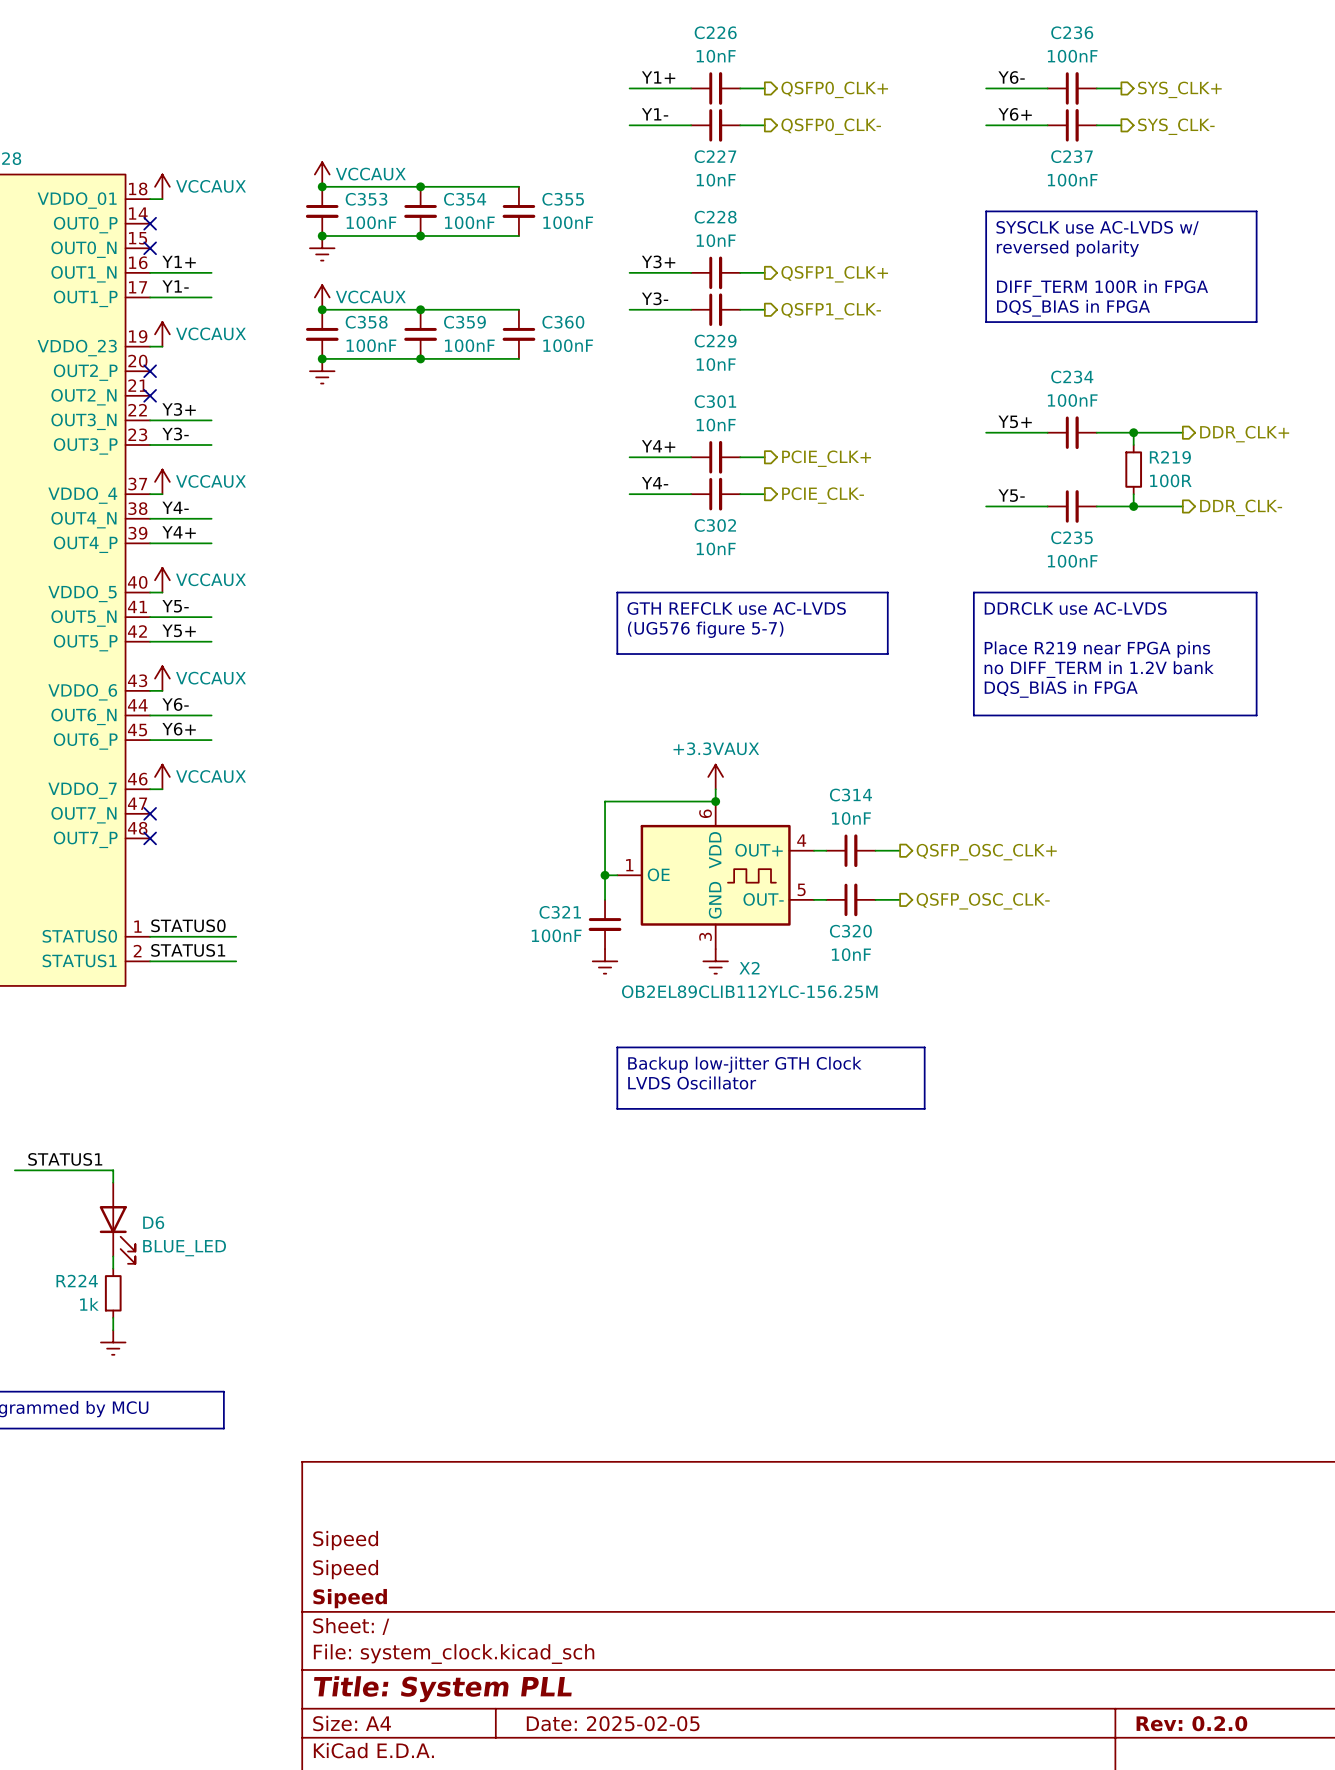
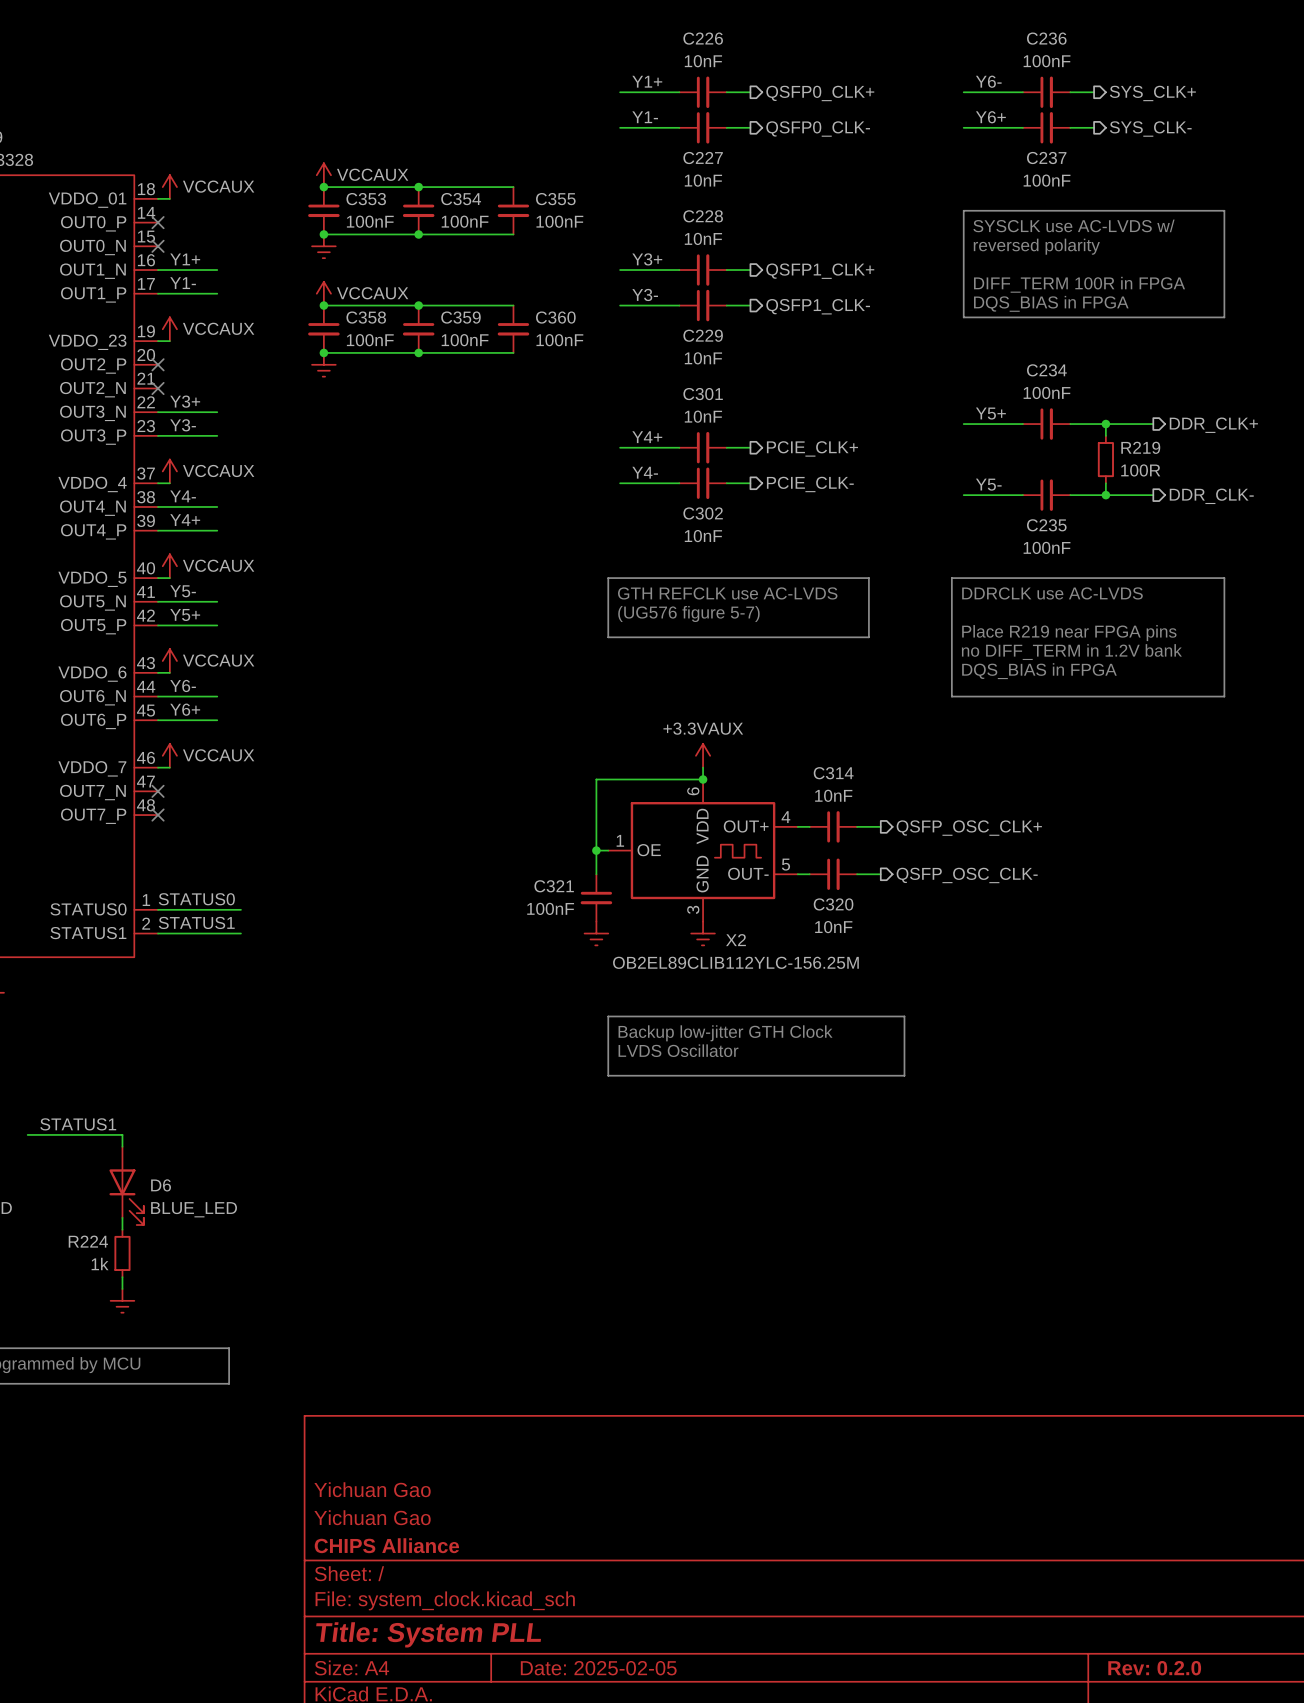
title block: Sipeed (345, 1540) -> Yichuan Gao (372, 1489)
title block: Sipeed (345, 1569) -> Yichuan Gao (372, 1517)
title block: Sipeed (350, 1598) -> CHIPS Alliance (386, 1545)

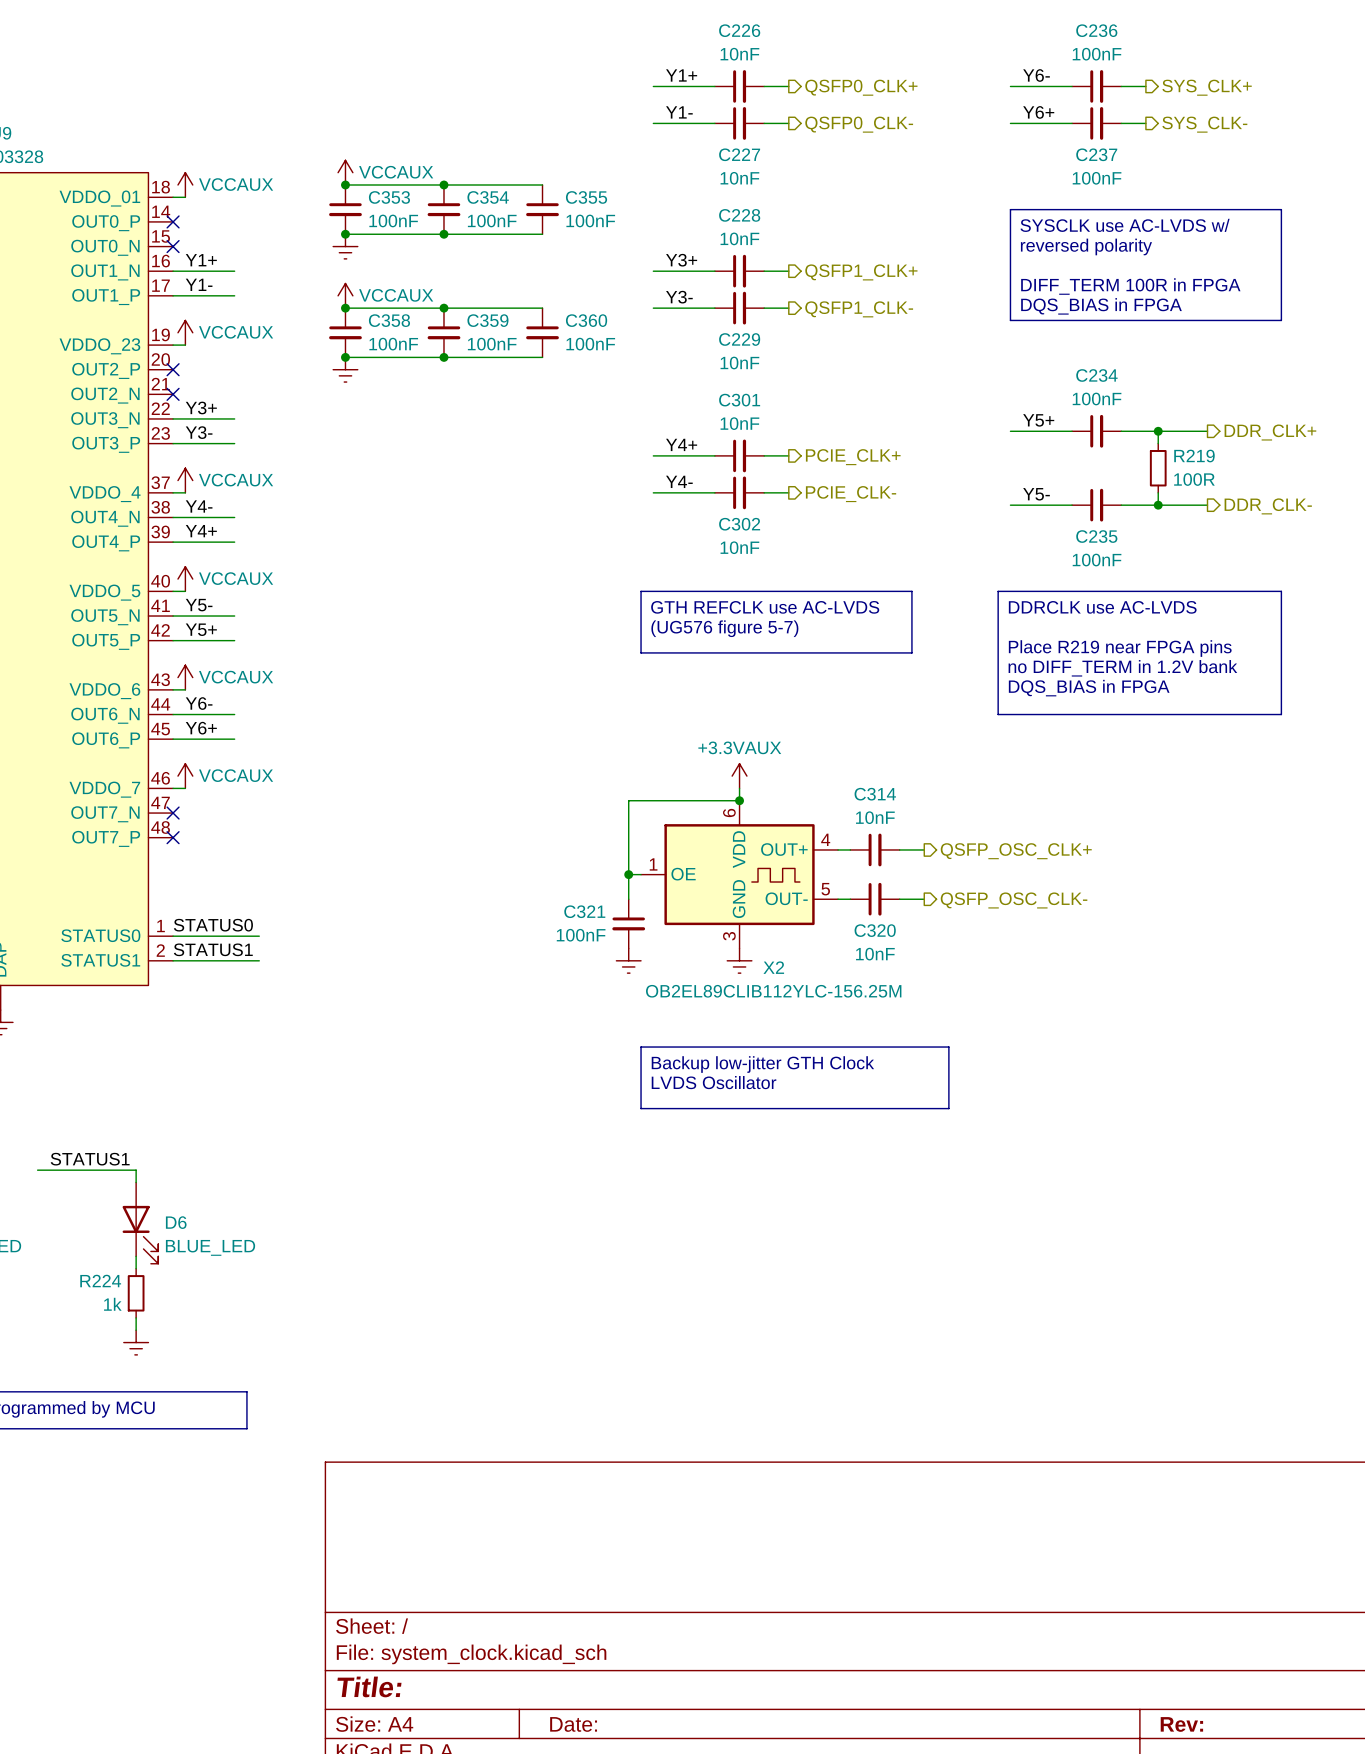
title block: Yichuan Gao (372, 1489) -> none
title block: Yichuan Gao (372, 1517) -> none
title block: CHIPS Alliance (386, 1545) -> none
title block: Title: System PLL (428, 1634) -> Title: (369, 1686)
title block: Date: 2025-02-05 (598, 1668) -> Date: (573, 1724)
title block: Rev: 0.2.0 (1154, 1668) -> Rev: (1181, 1724)

